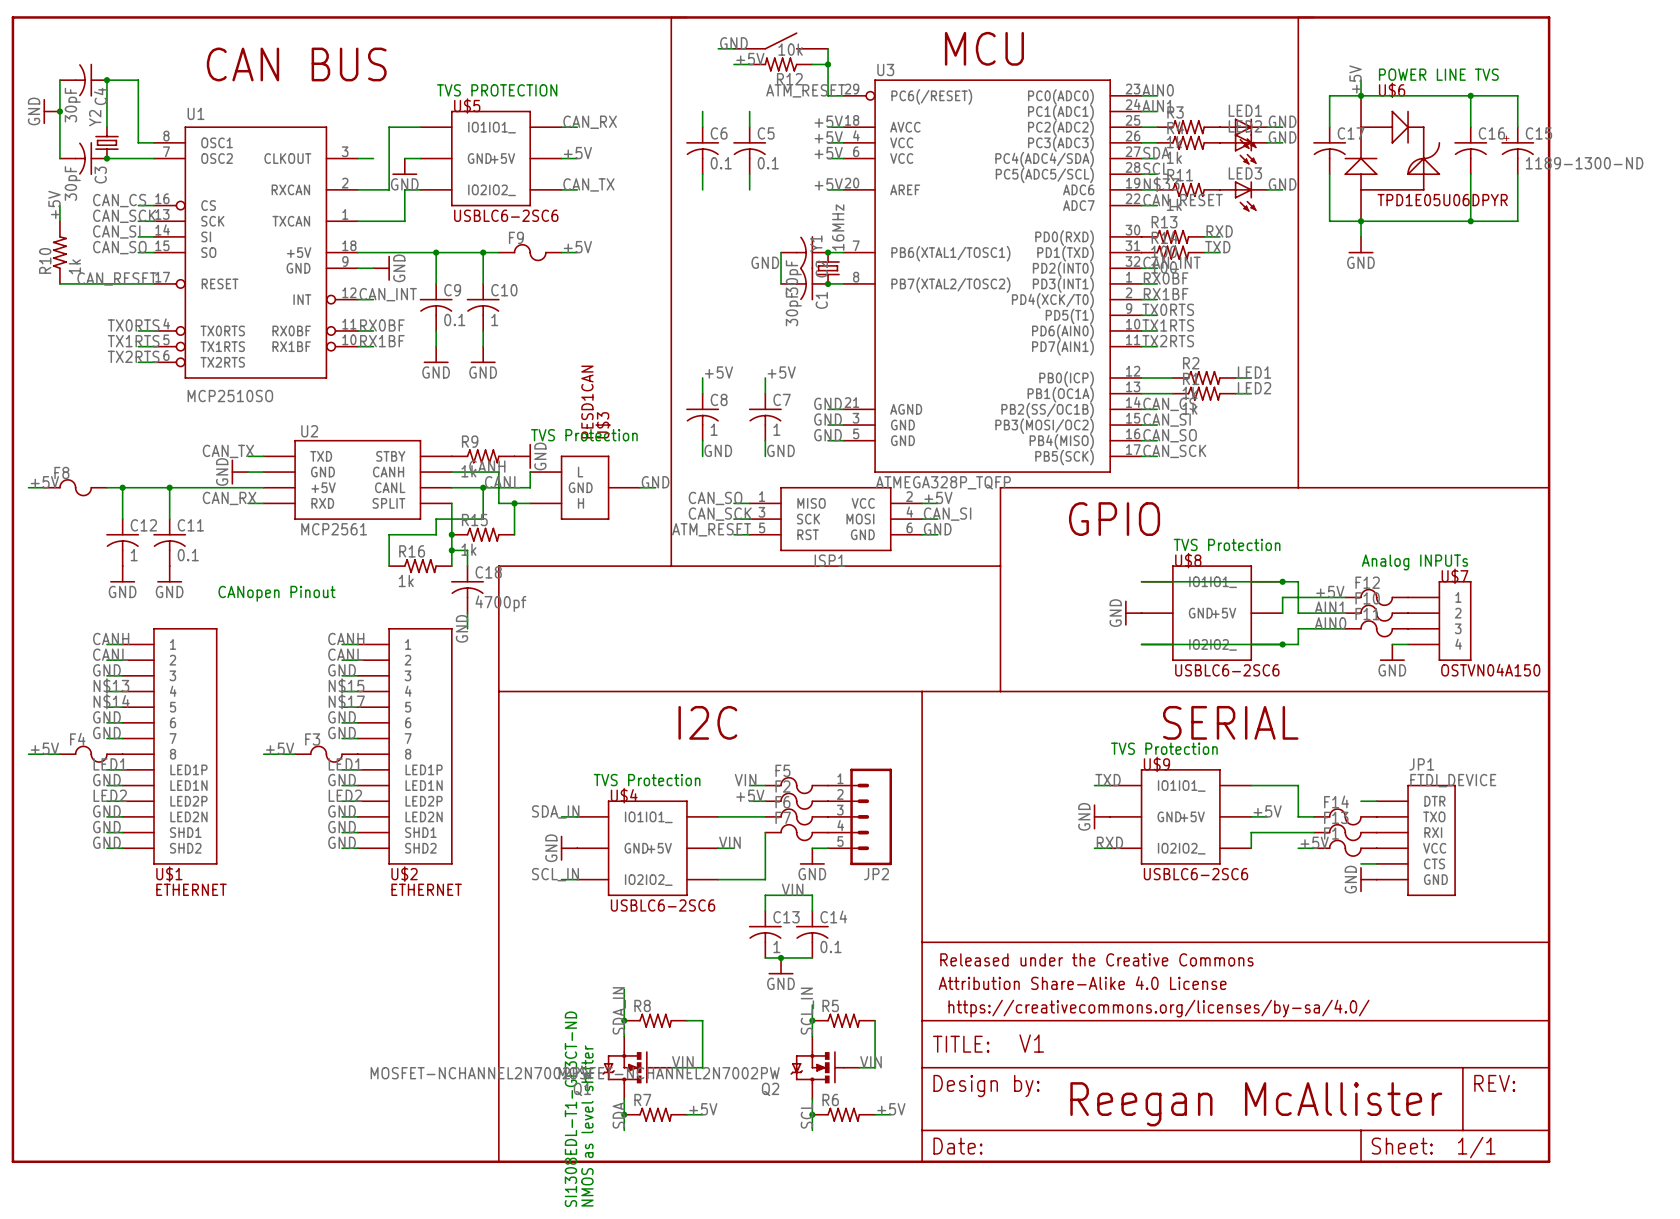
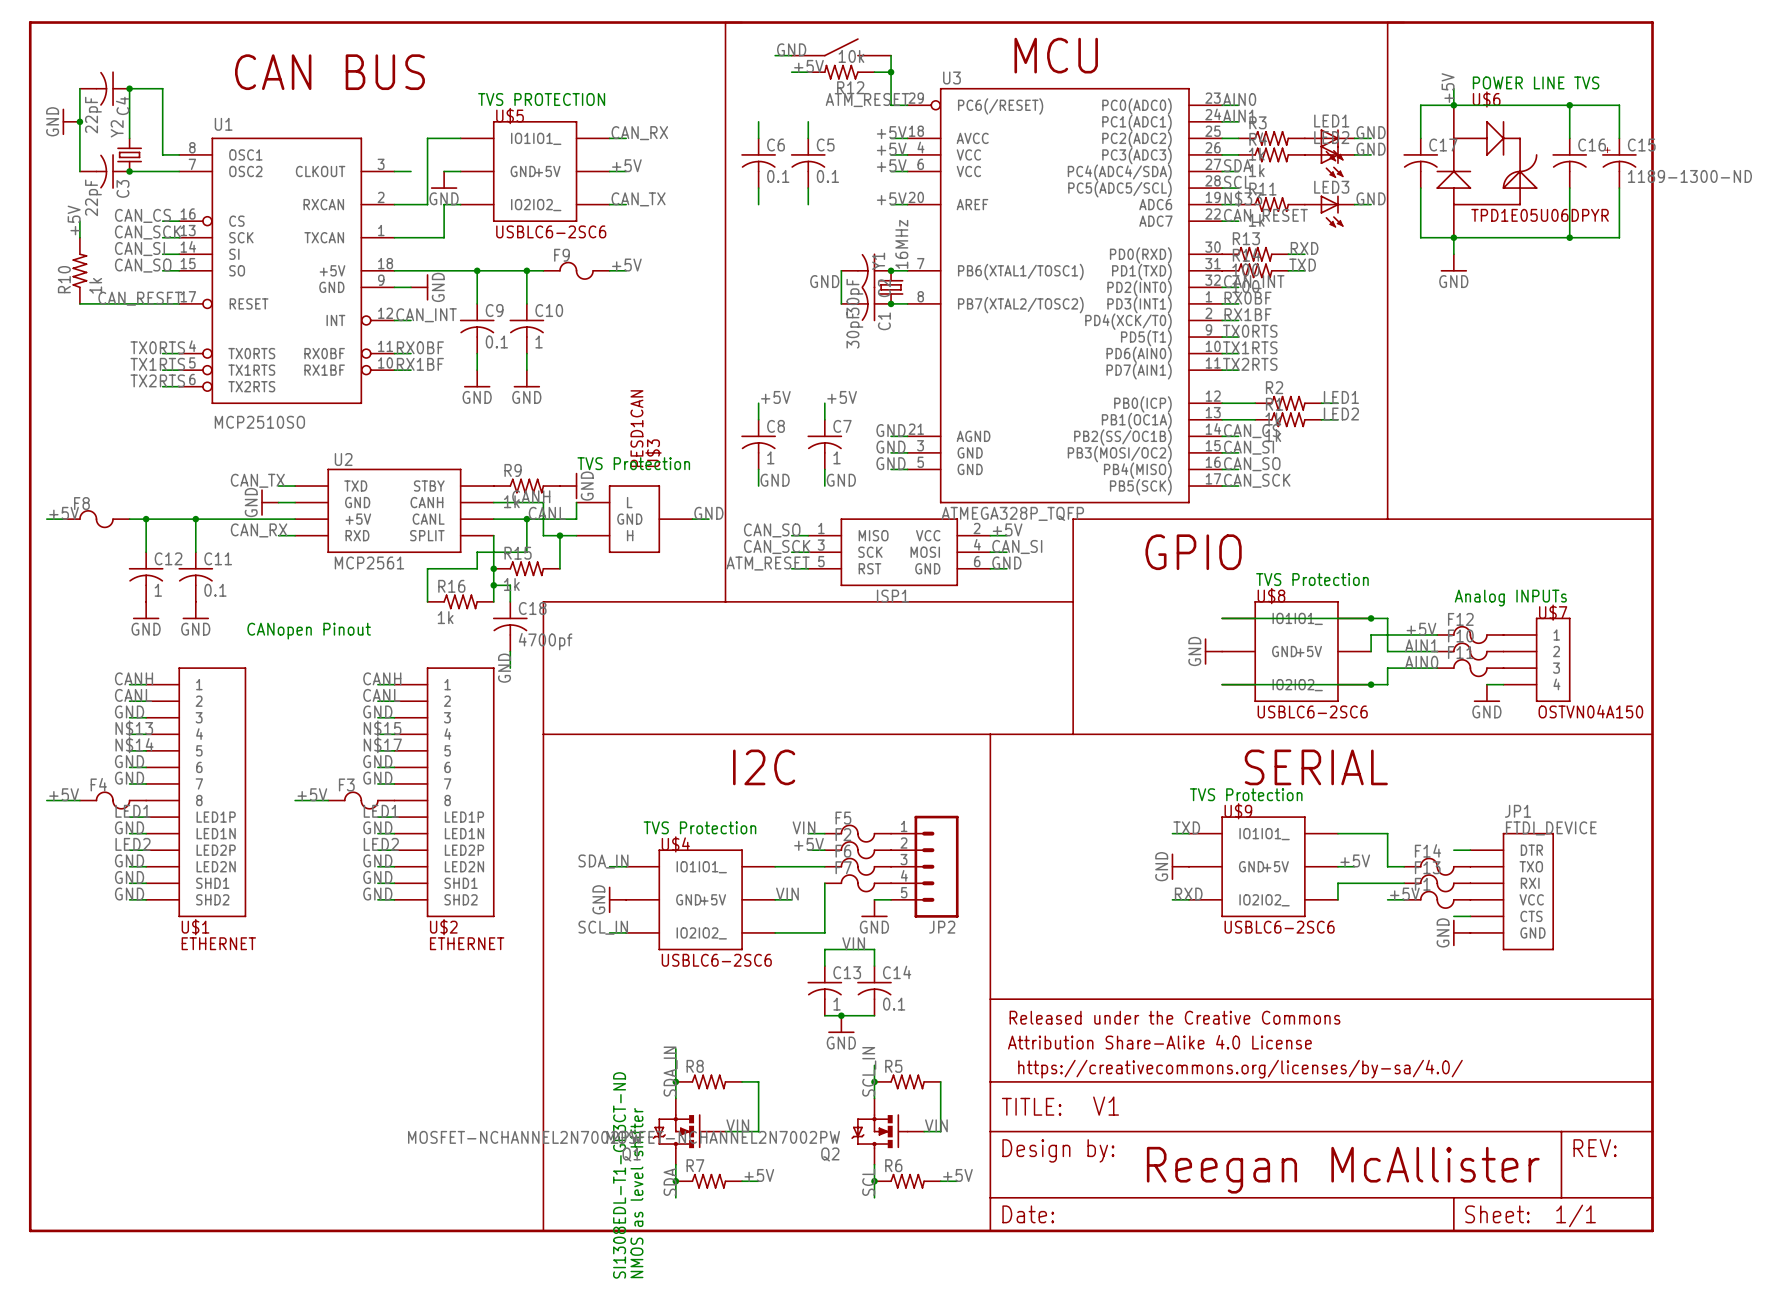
C4 value: 30pF (72, 105) -> 22pF (93, 115)
C3 value: 30pF (72, 183) -> 22pF (93, 197)

